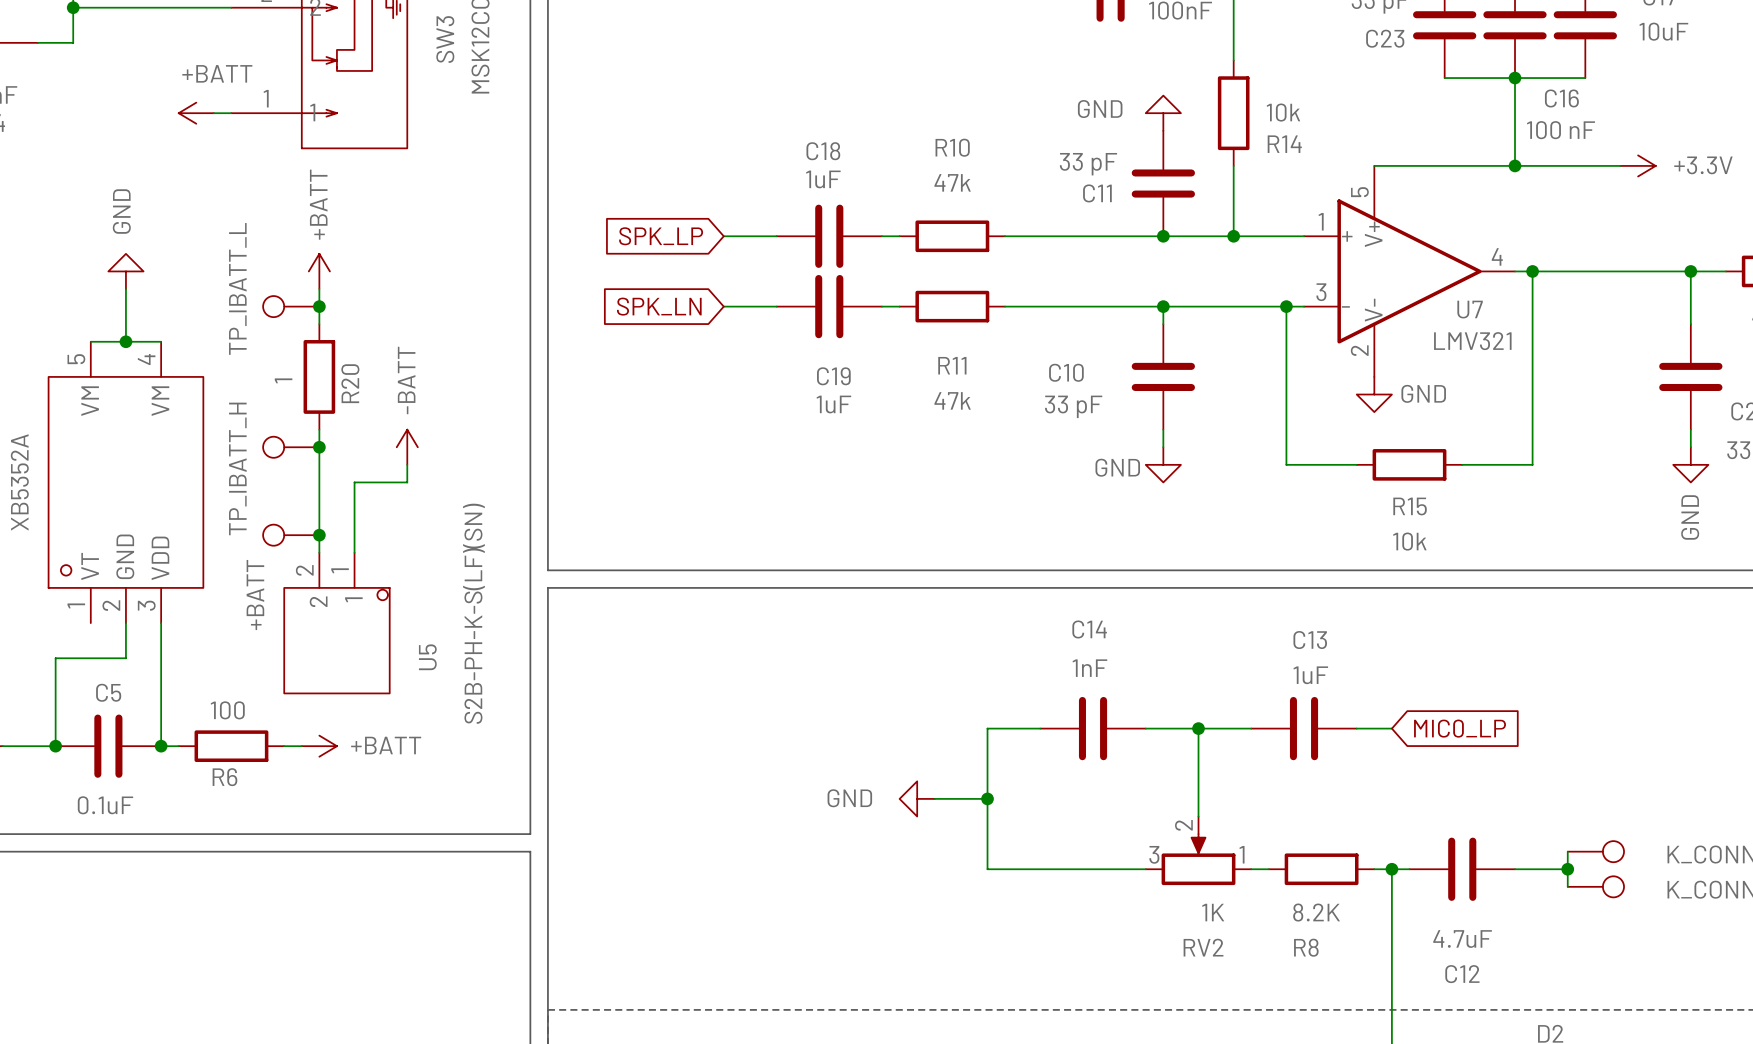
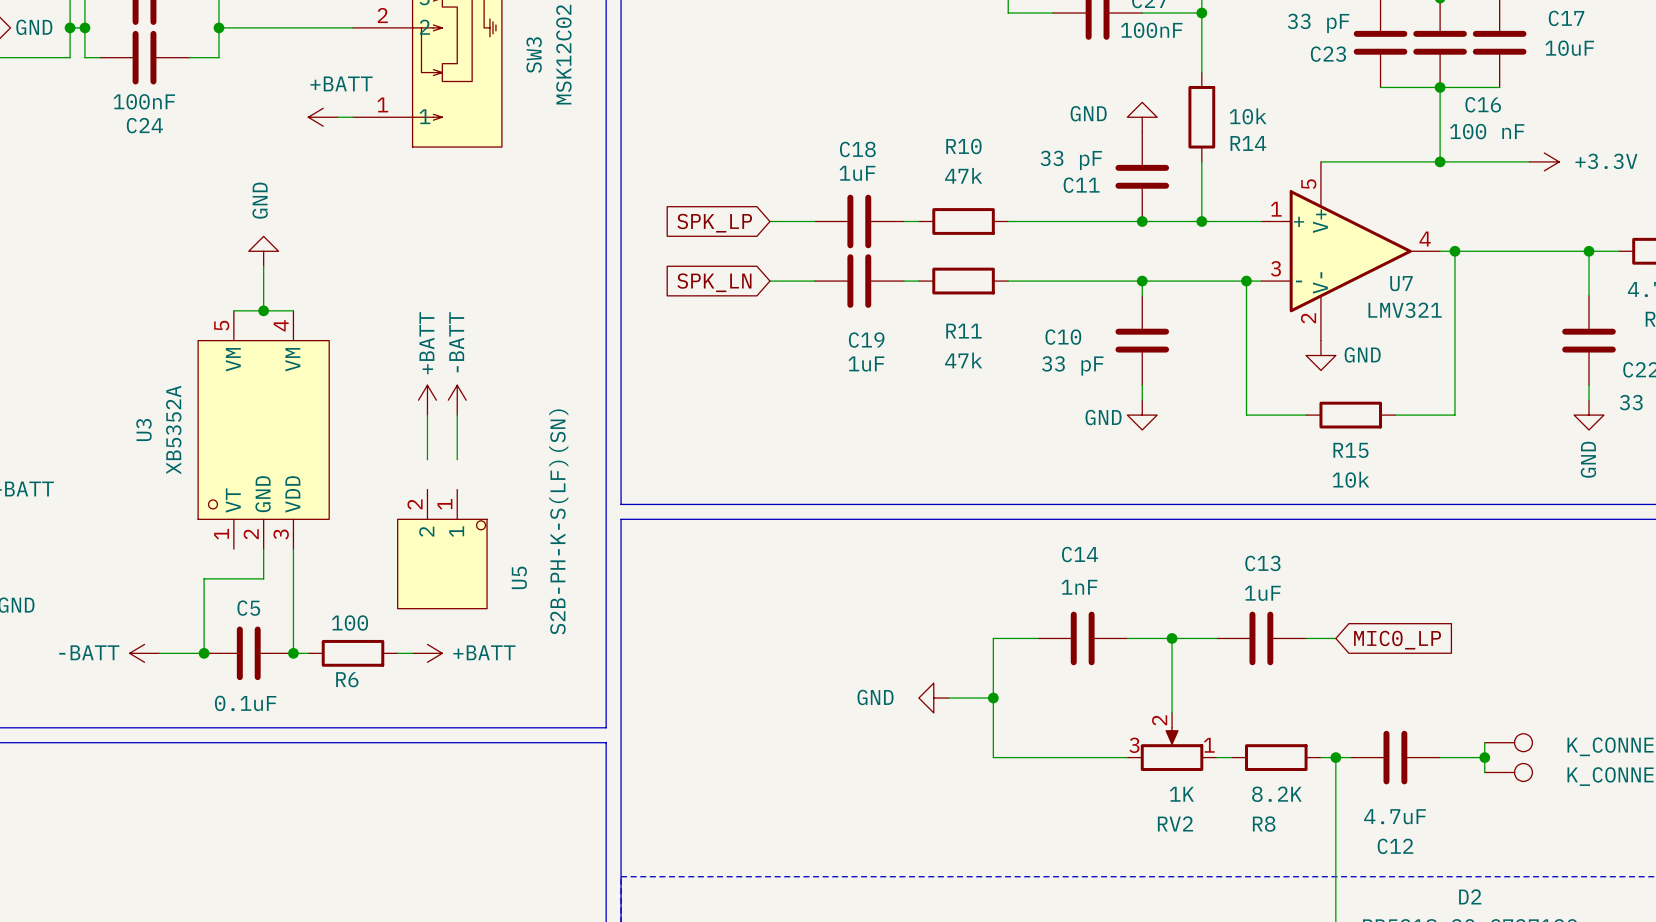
power symbol position: +BATT (319, 271) -> +BATT (427, 400)
wire: (319, 289) (319, 324) -> none
part: TP_IBATT_L (291, 306) -> none
junction: (319, 306) -> none
R20: 1 (319, 376) -> none
part: TP_IBATT_H (291, 447) -> none
junction: (319, 447) -> none
power symbol position: -BATT (407, 447) -> -BATT (457, 400)
wire: (407, 464) (407, 482) (354, 482) -> (457, 415) (457, 429)
wire: (319, 517) (319, 552) -> none
wire: (354, 517) (354, 552) -> none
part: +BATT (291, 535) -> none
junction: (319, 535) -> none

